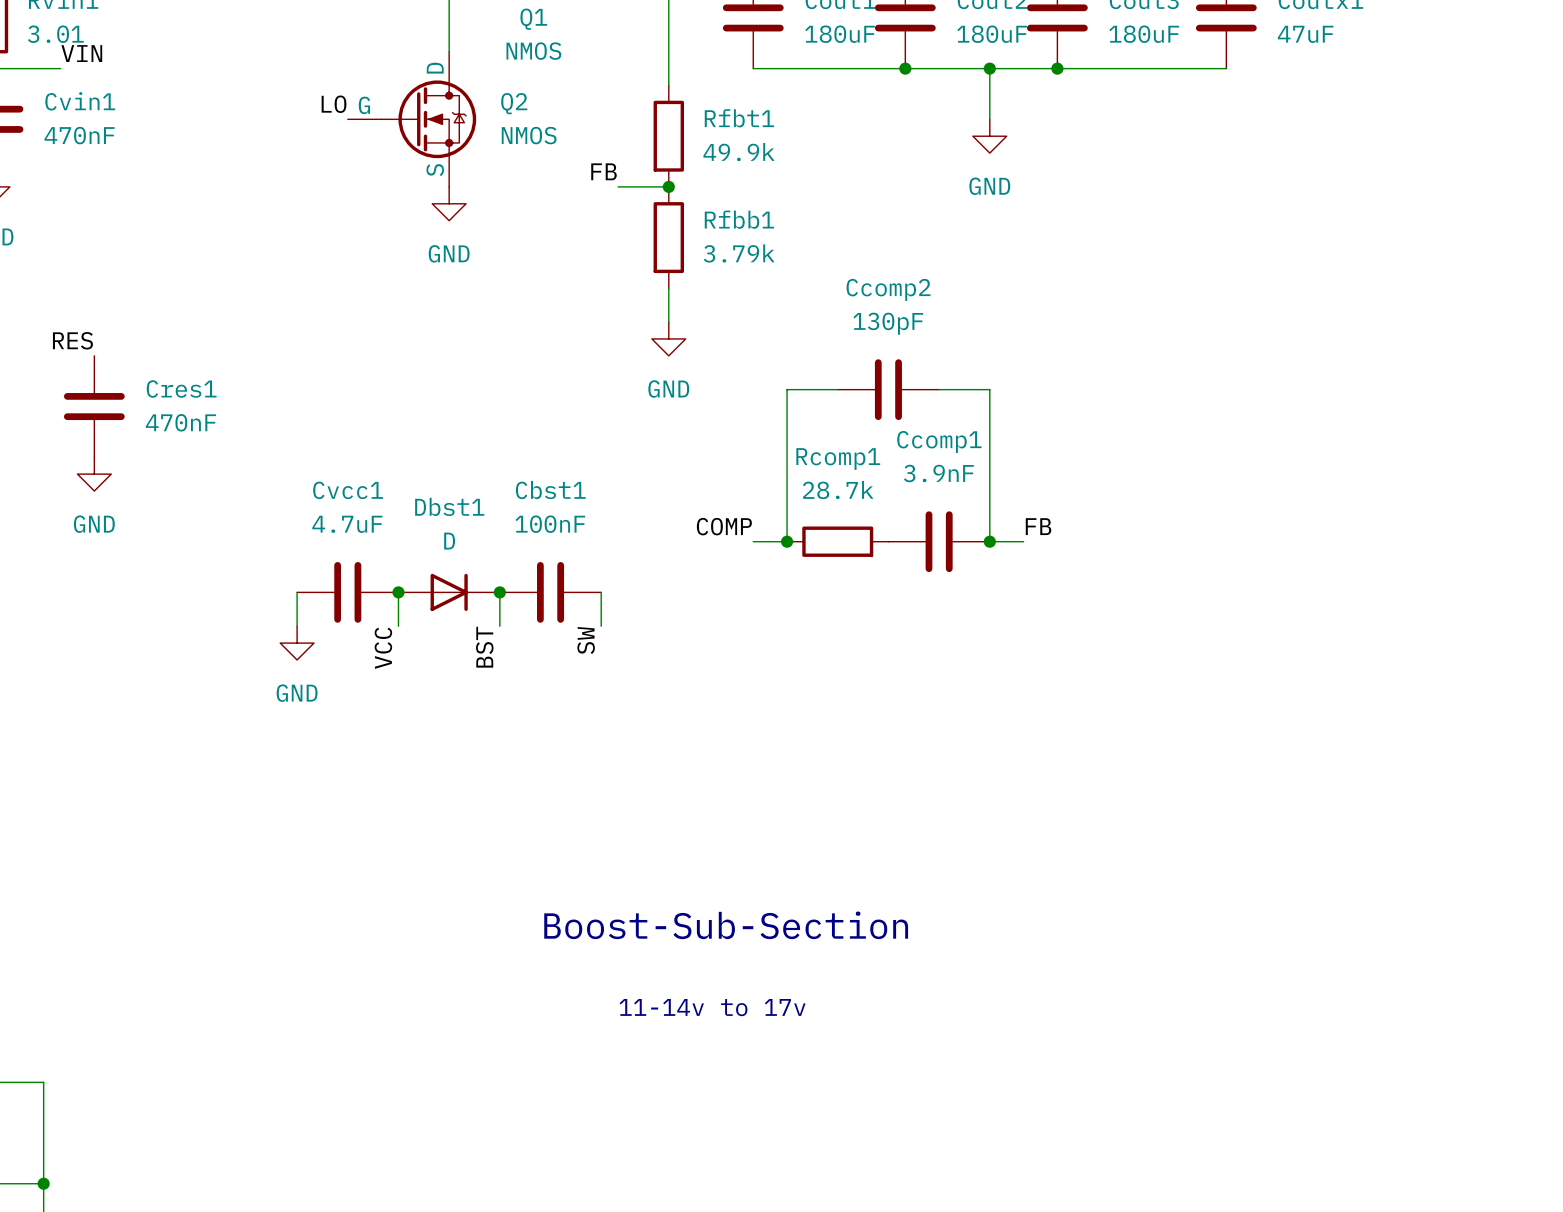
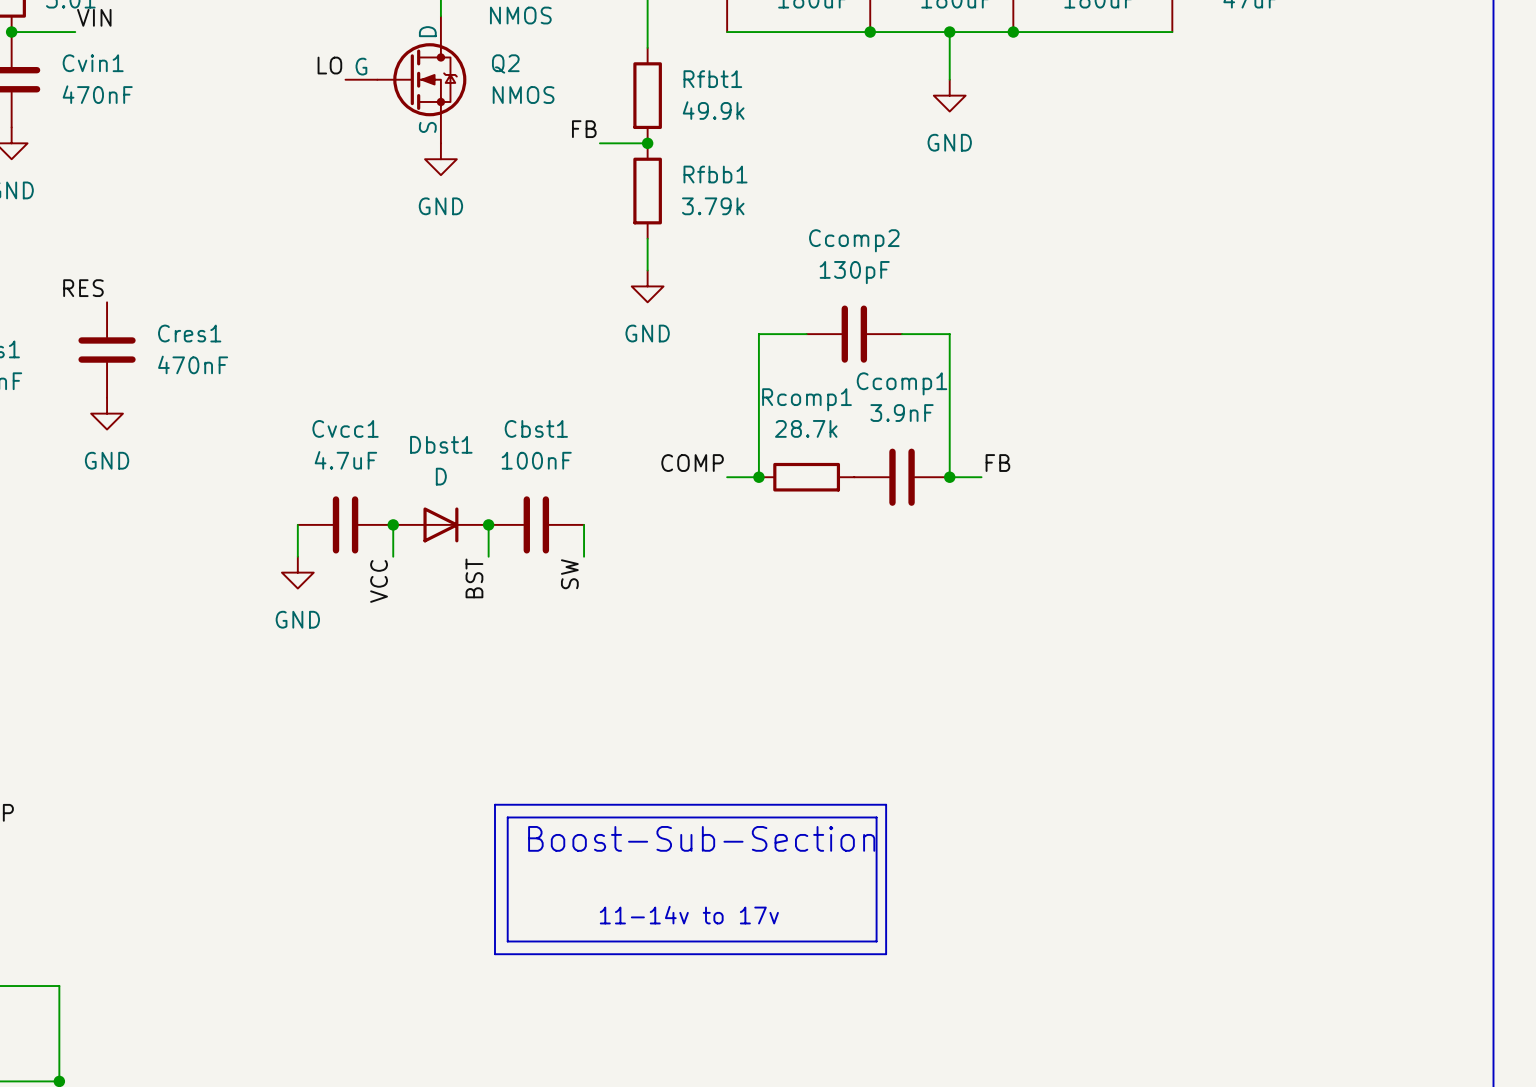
line: none -> (494, 804) (886, 804) (886, 954) (494, 954) (494, 804)
line: none -> (507, 817) (876, 817) (876, 941) (507, 941) (507, 817)

